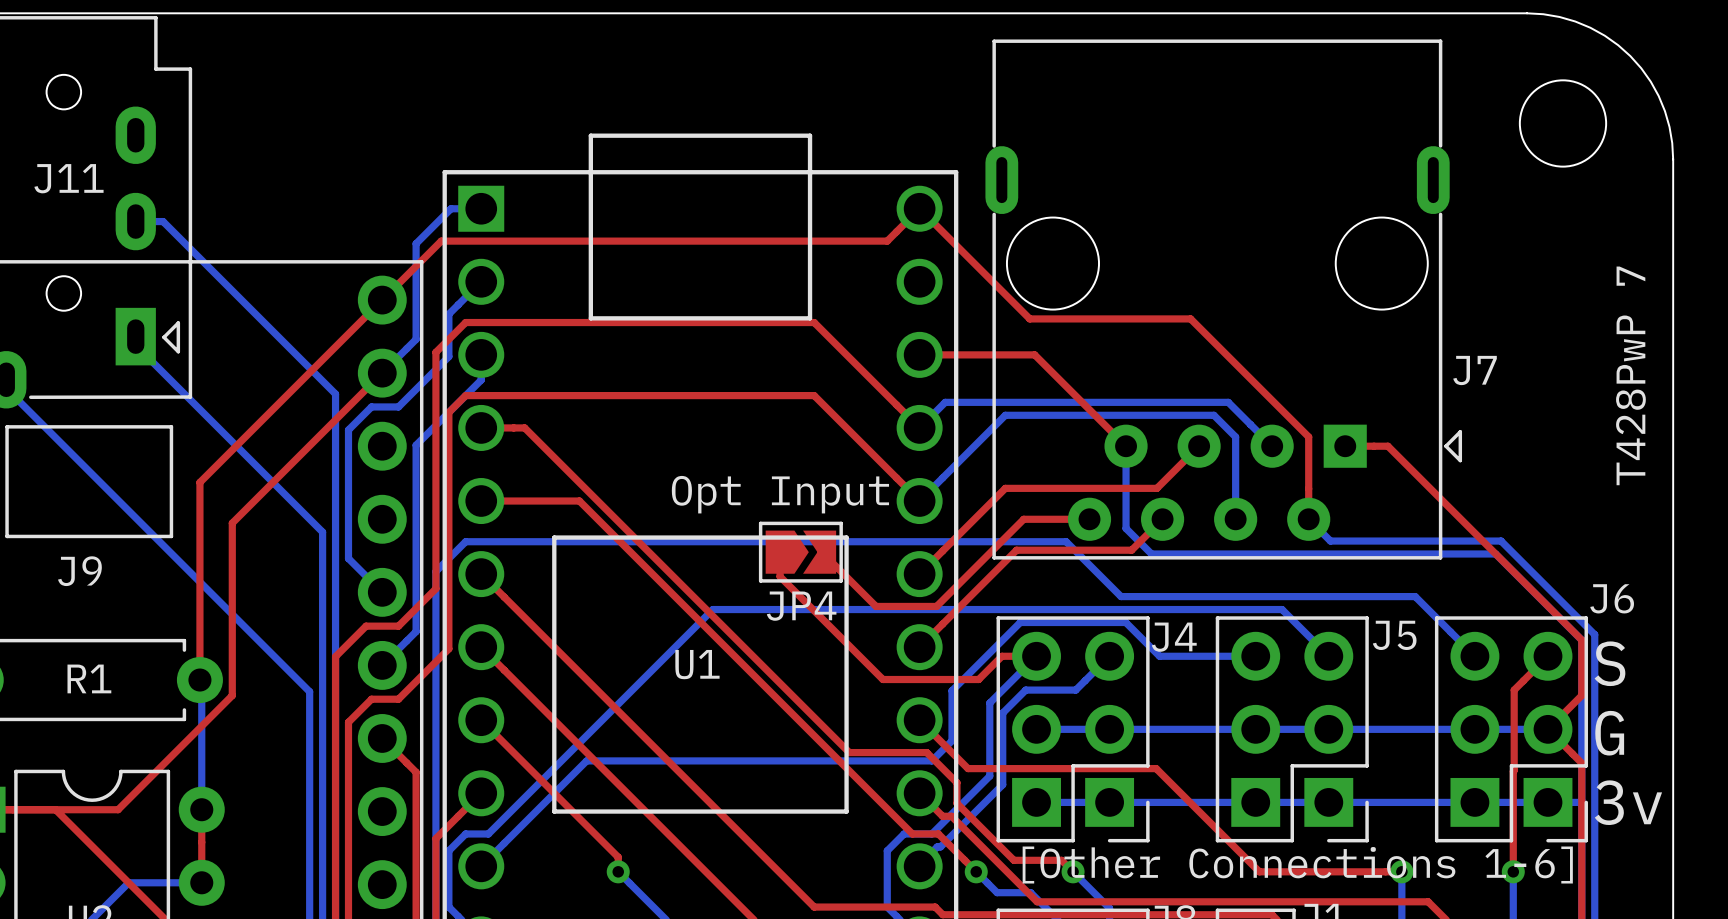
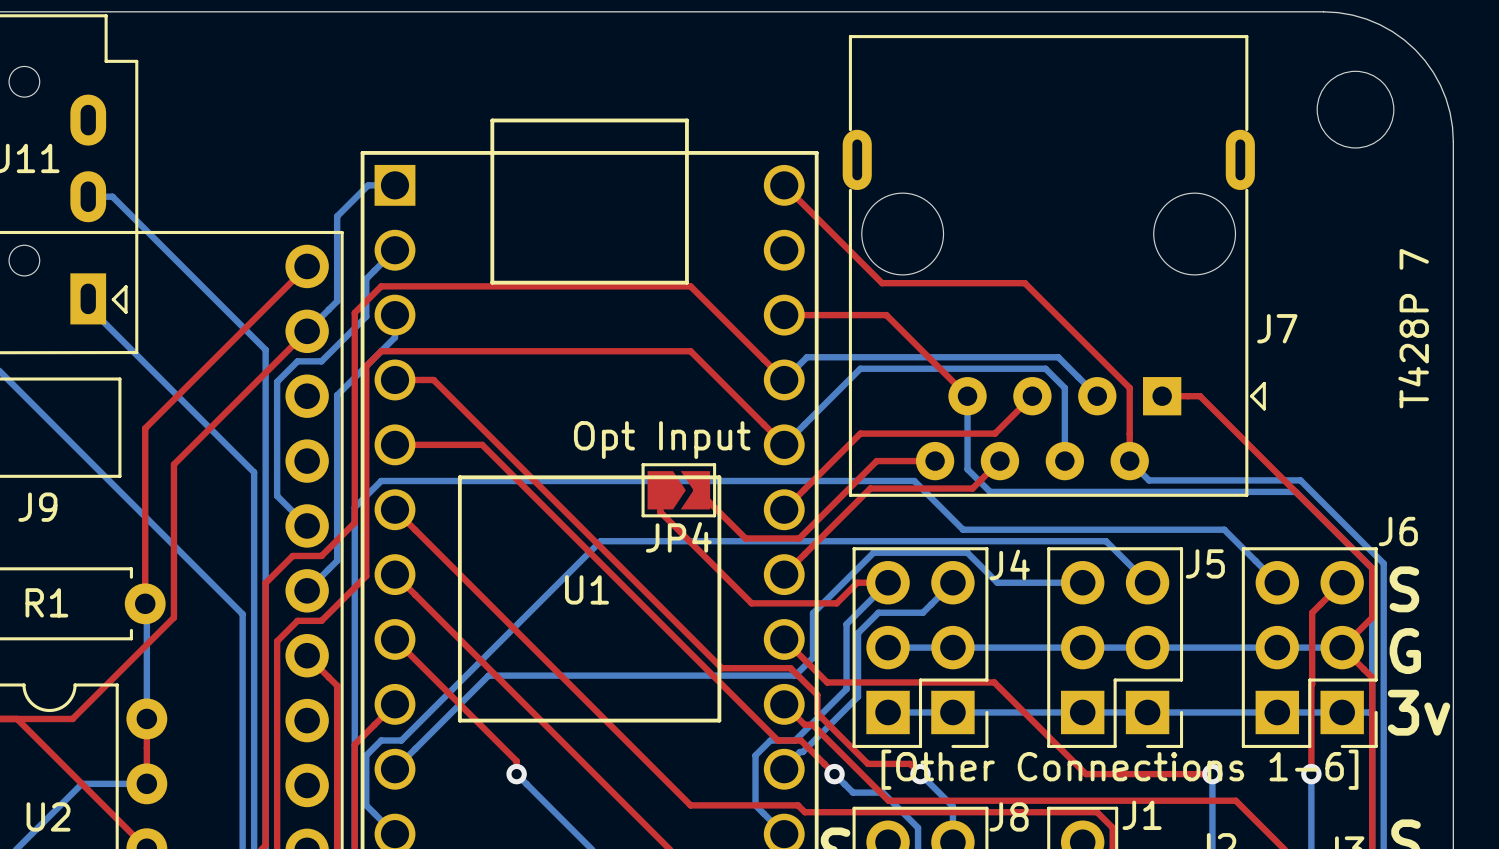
top track: (919, 208) (887, 241) (441, 241) (382, 300) -> none
text: T428PwP 7 (1630, 375) -> T428P 7 (1413, 328)

